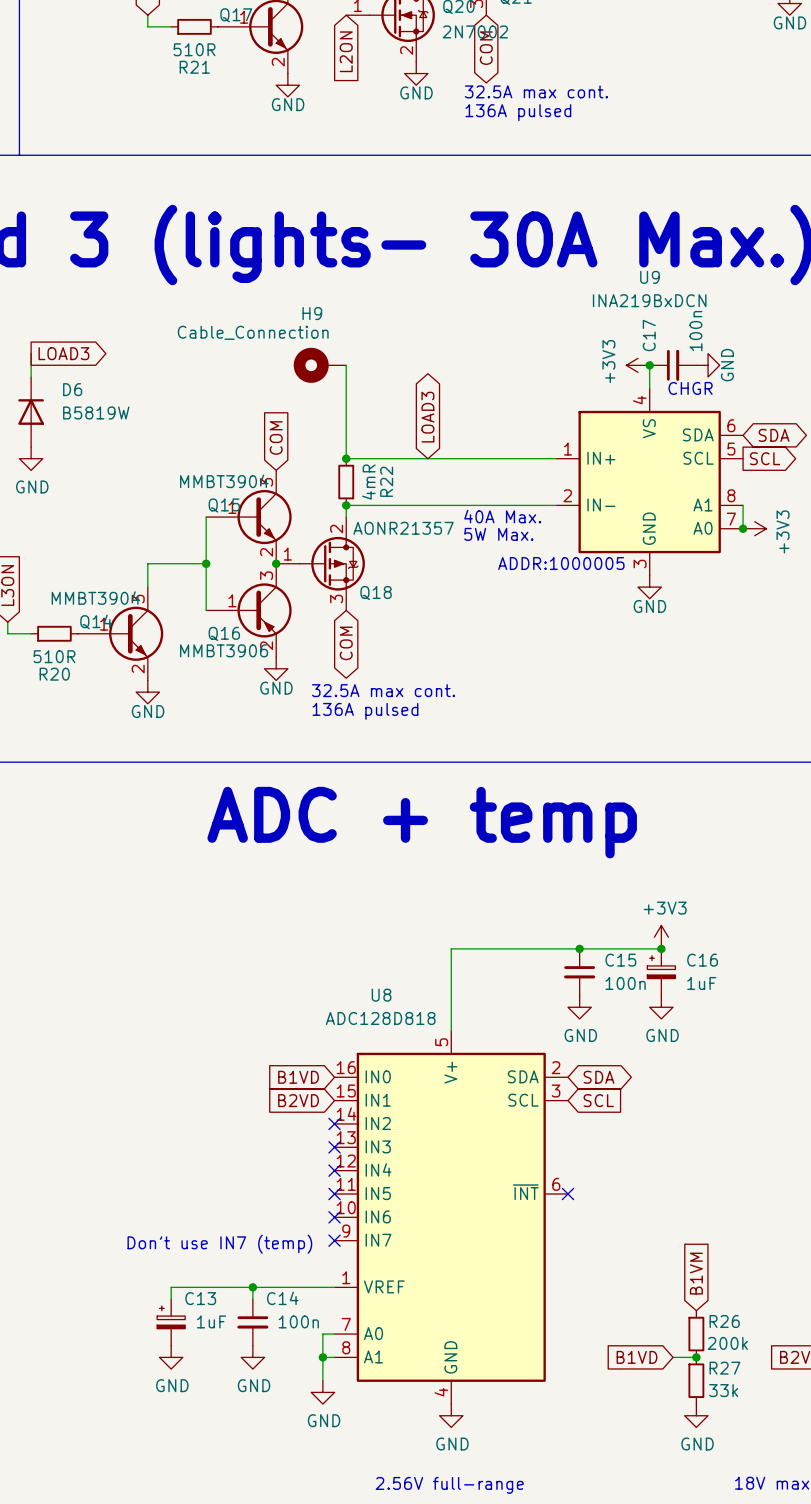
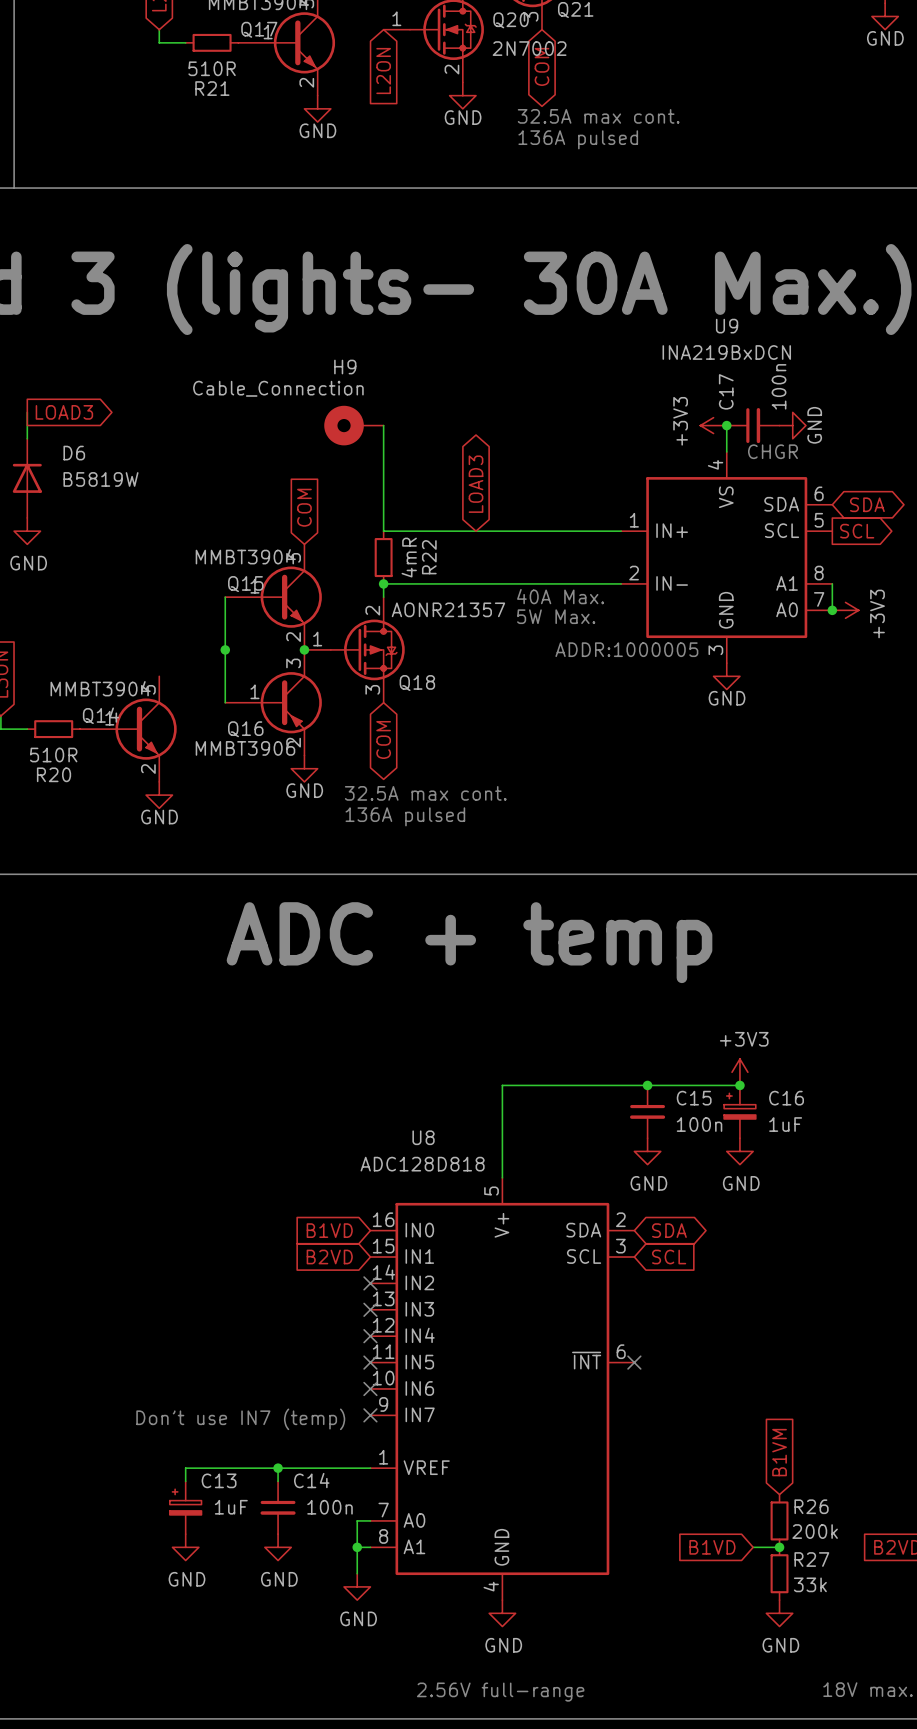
junction: (346, 458) -> none
wire: (206, 563) (147, 563) (147, 587) -> none

